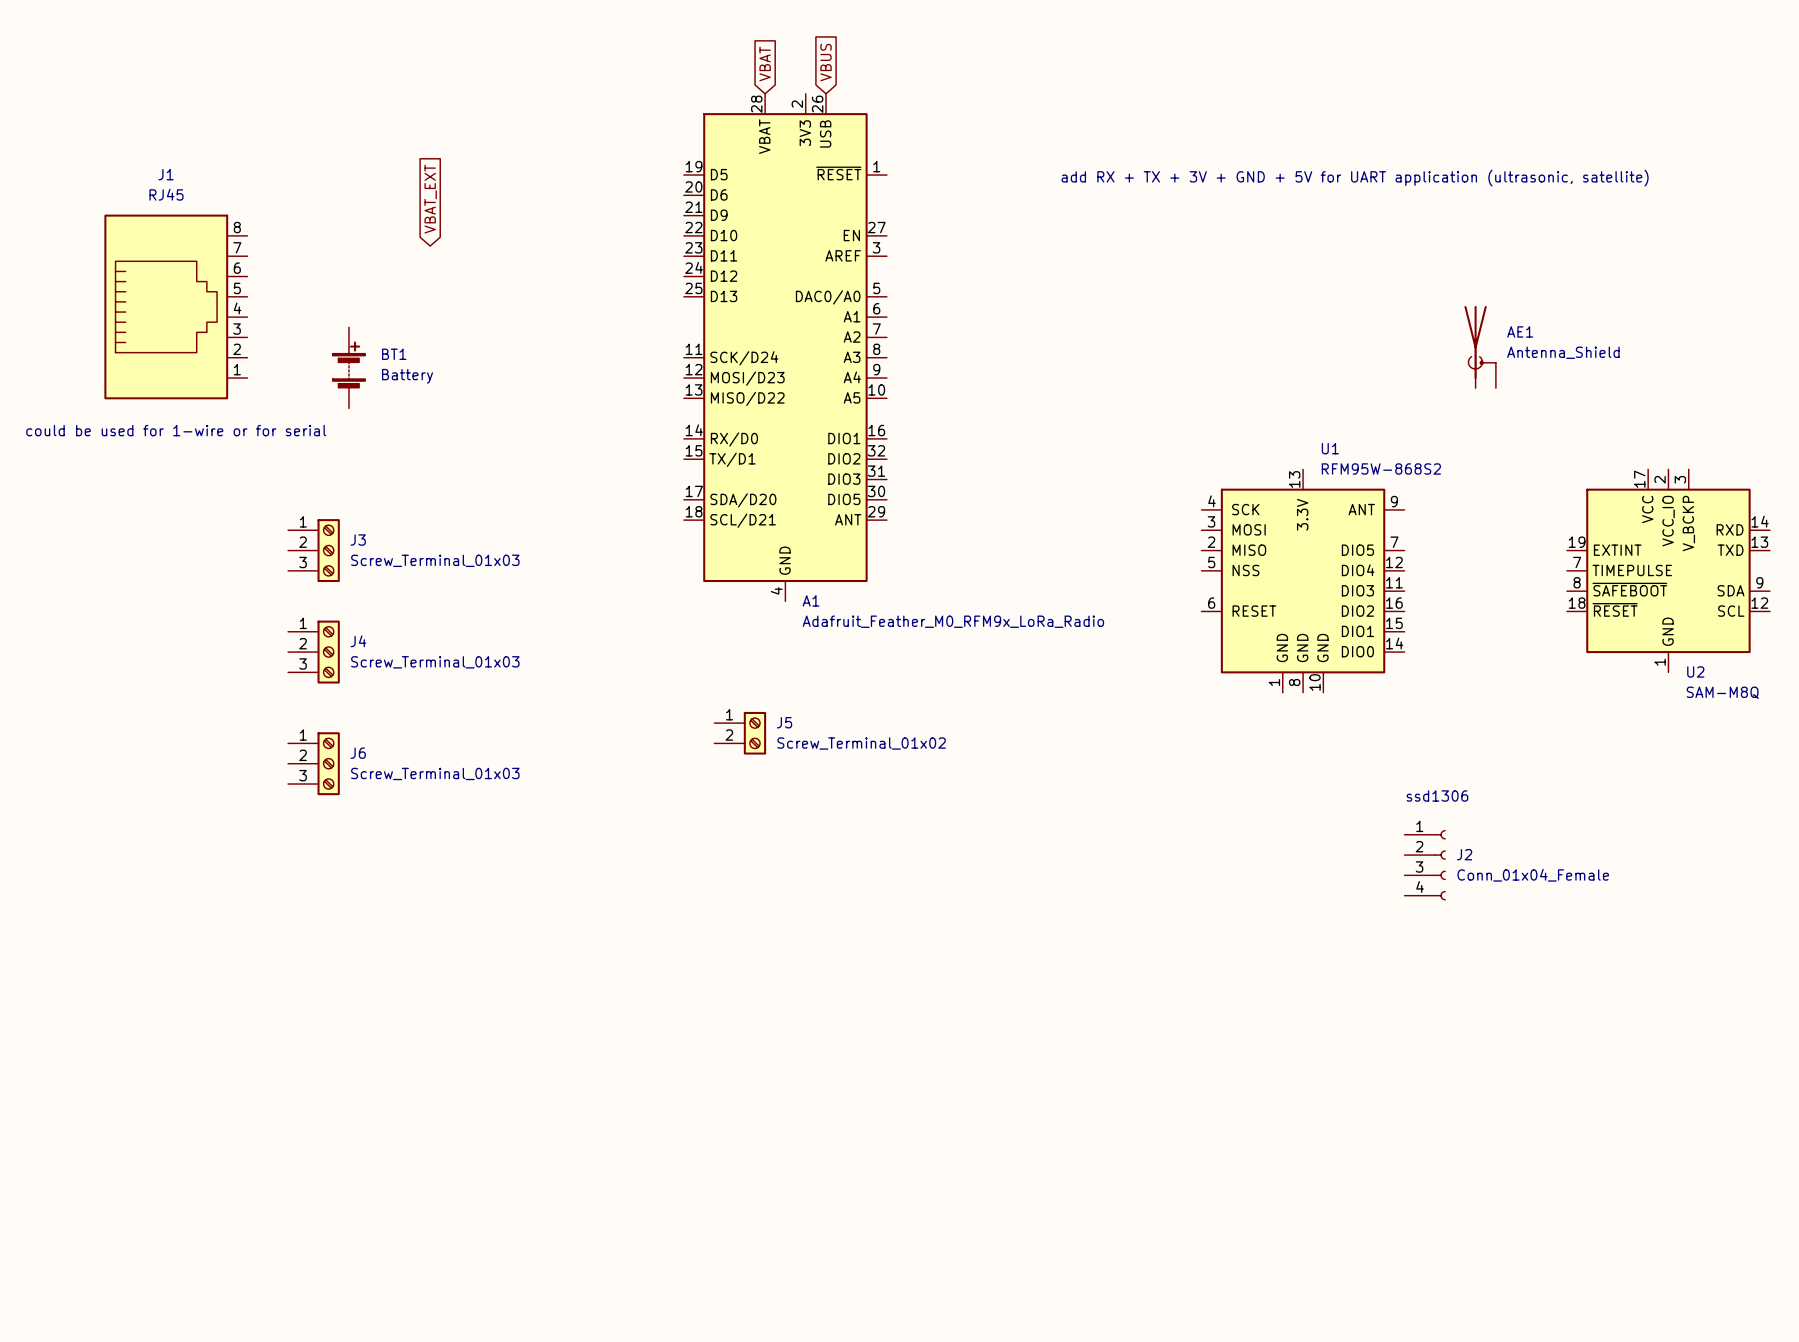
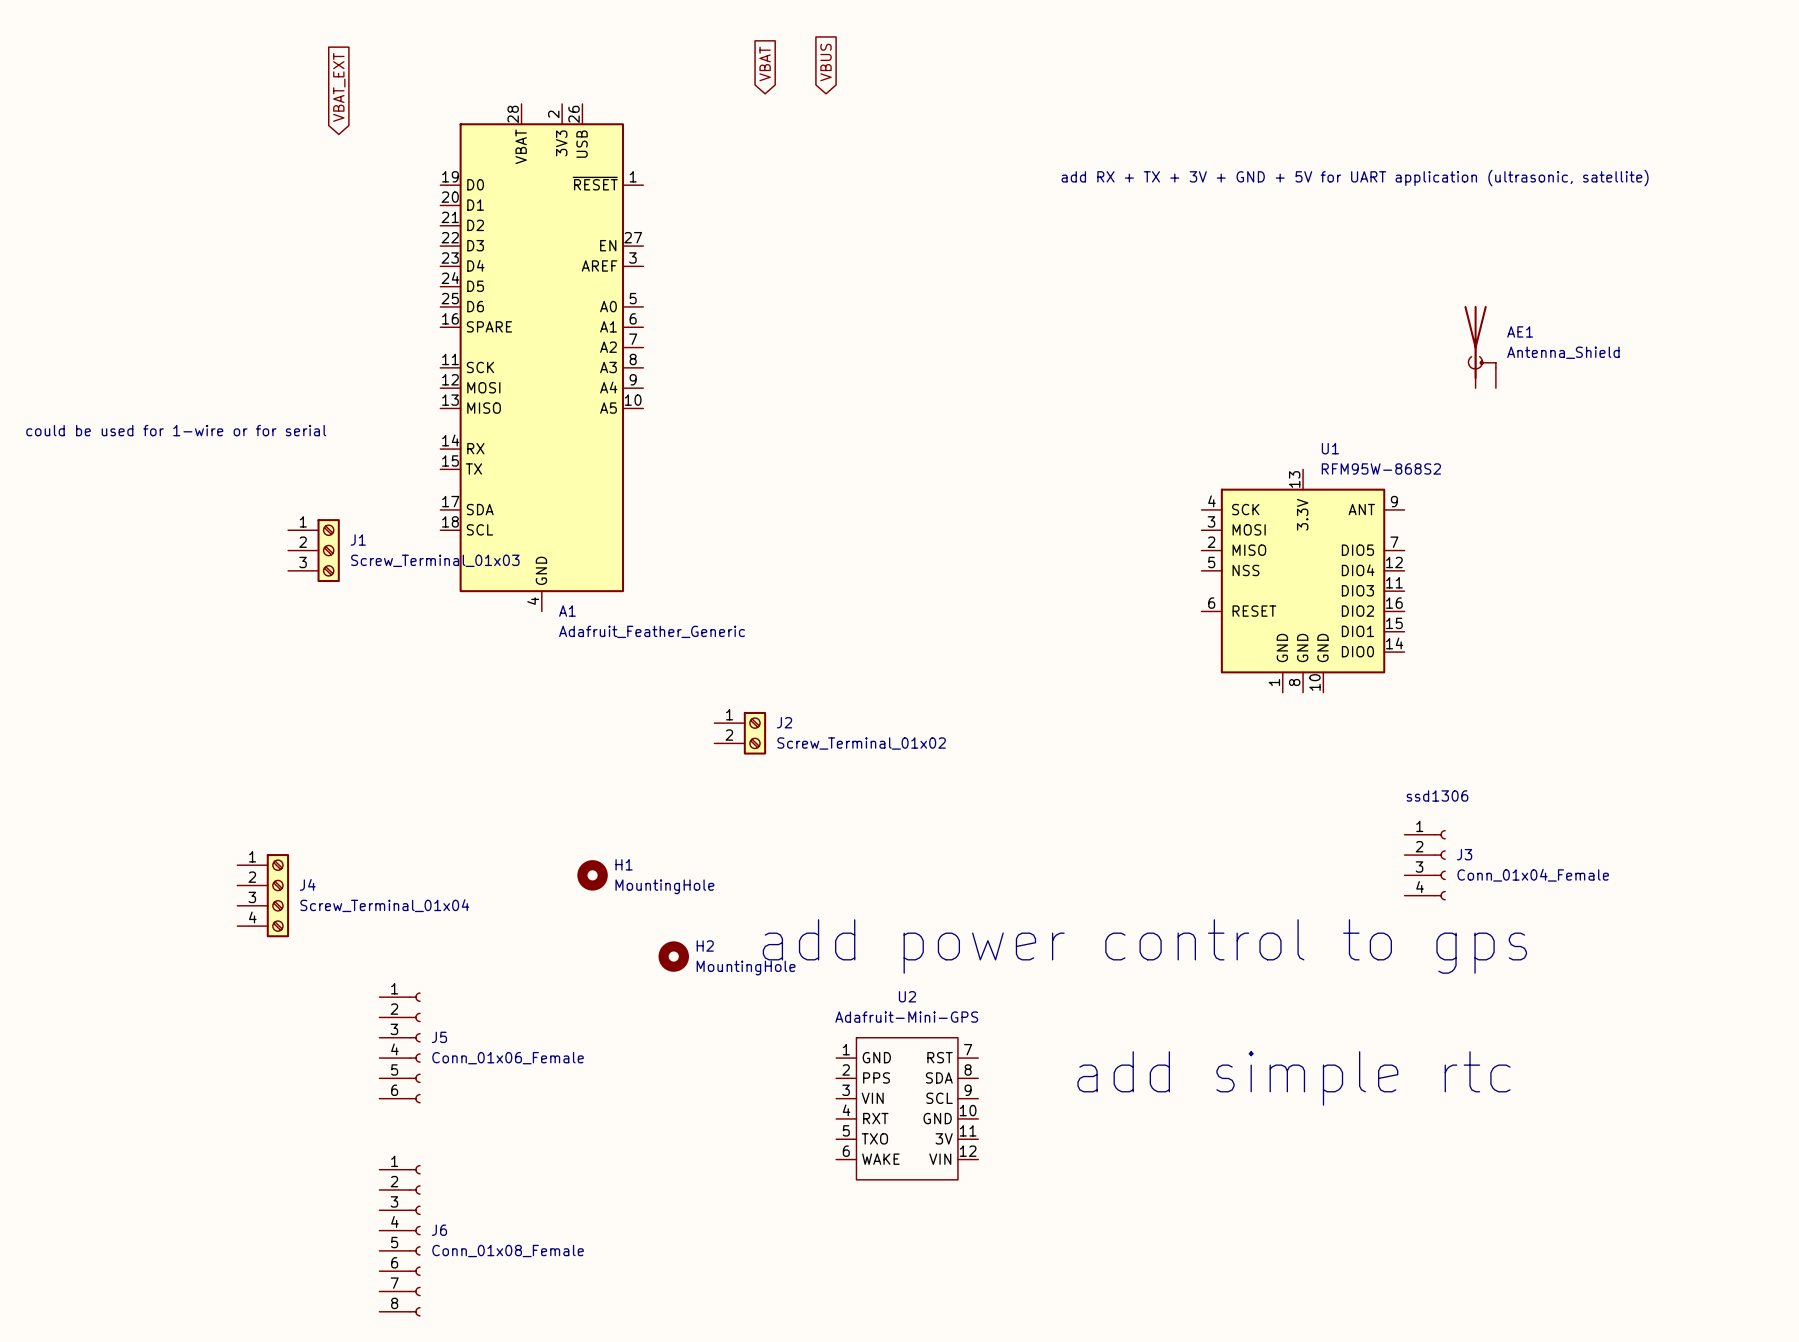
A1 symbol: [683, 93, 887, 602] -> [440, 103, 644, 612]
global label position: VBAT_EXT (430, 199) -> VBAT_EXT (339, 87)
J1: RJ45 (175, 306) -> none
BT1: Battery (348, 367) -> none
U2 symbol: [1566, 469, 1770, 673] -> [836, 1037, 979, 1180]
J3 name: J3 (358, 540) -> J1 (358, 540)
J4 symbol: [288, 620, 340, 684] -> [237, 854, 290, 938]
A1 value: Adafruit_Feather_M0_RFM9x_LoRa_Radio (953, 621) -> Adafruit_Feather_Generic (652, 631)
J4 value: Screw_Terminal_01x03 (435, 662) -> Screw_Terminal_01x04 (384, 905)
U2 name position: U2 (1695, 671) -> U2 (907, 996)
U2 value: SAM-M8Q (1722, 692) -> Adafruit-Mini-GPS (906, 1017)
J5 name: J5 (784, 722) -> J2 (784, 722)
J6 symbol: [288, 732, 340, 796] -> [379, 1165, 421, 1317]
J6 value: Screw_Terminal_01x03 (435, 773) -> Conn_01x08_Female (508, 1251)
J2 name: J2 (1464, 854) -> J3 (1464, 854)
H1: none -> MountingHole (592, 875)
text: none -> add power control to gps (1144, 946)
H2: none -> MountingHole (673, 956)
J5: none -> Conn_01x06_Female (400, 1047)
text: none -> add simple rtc (1293, 1078)

